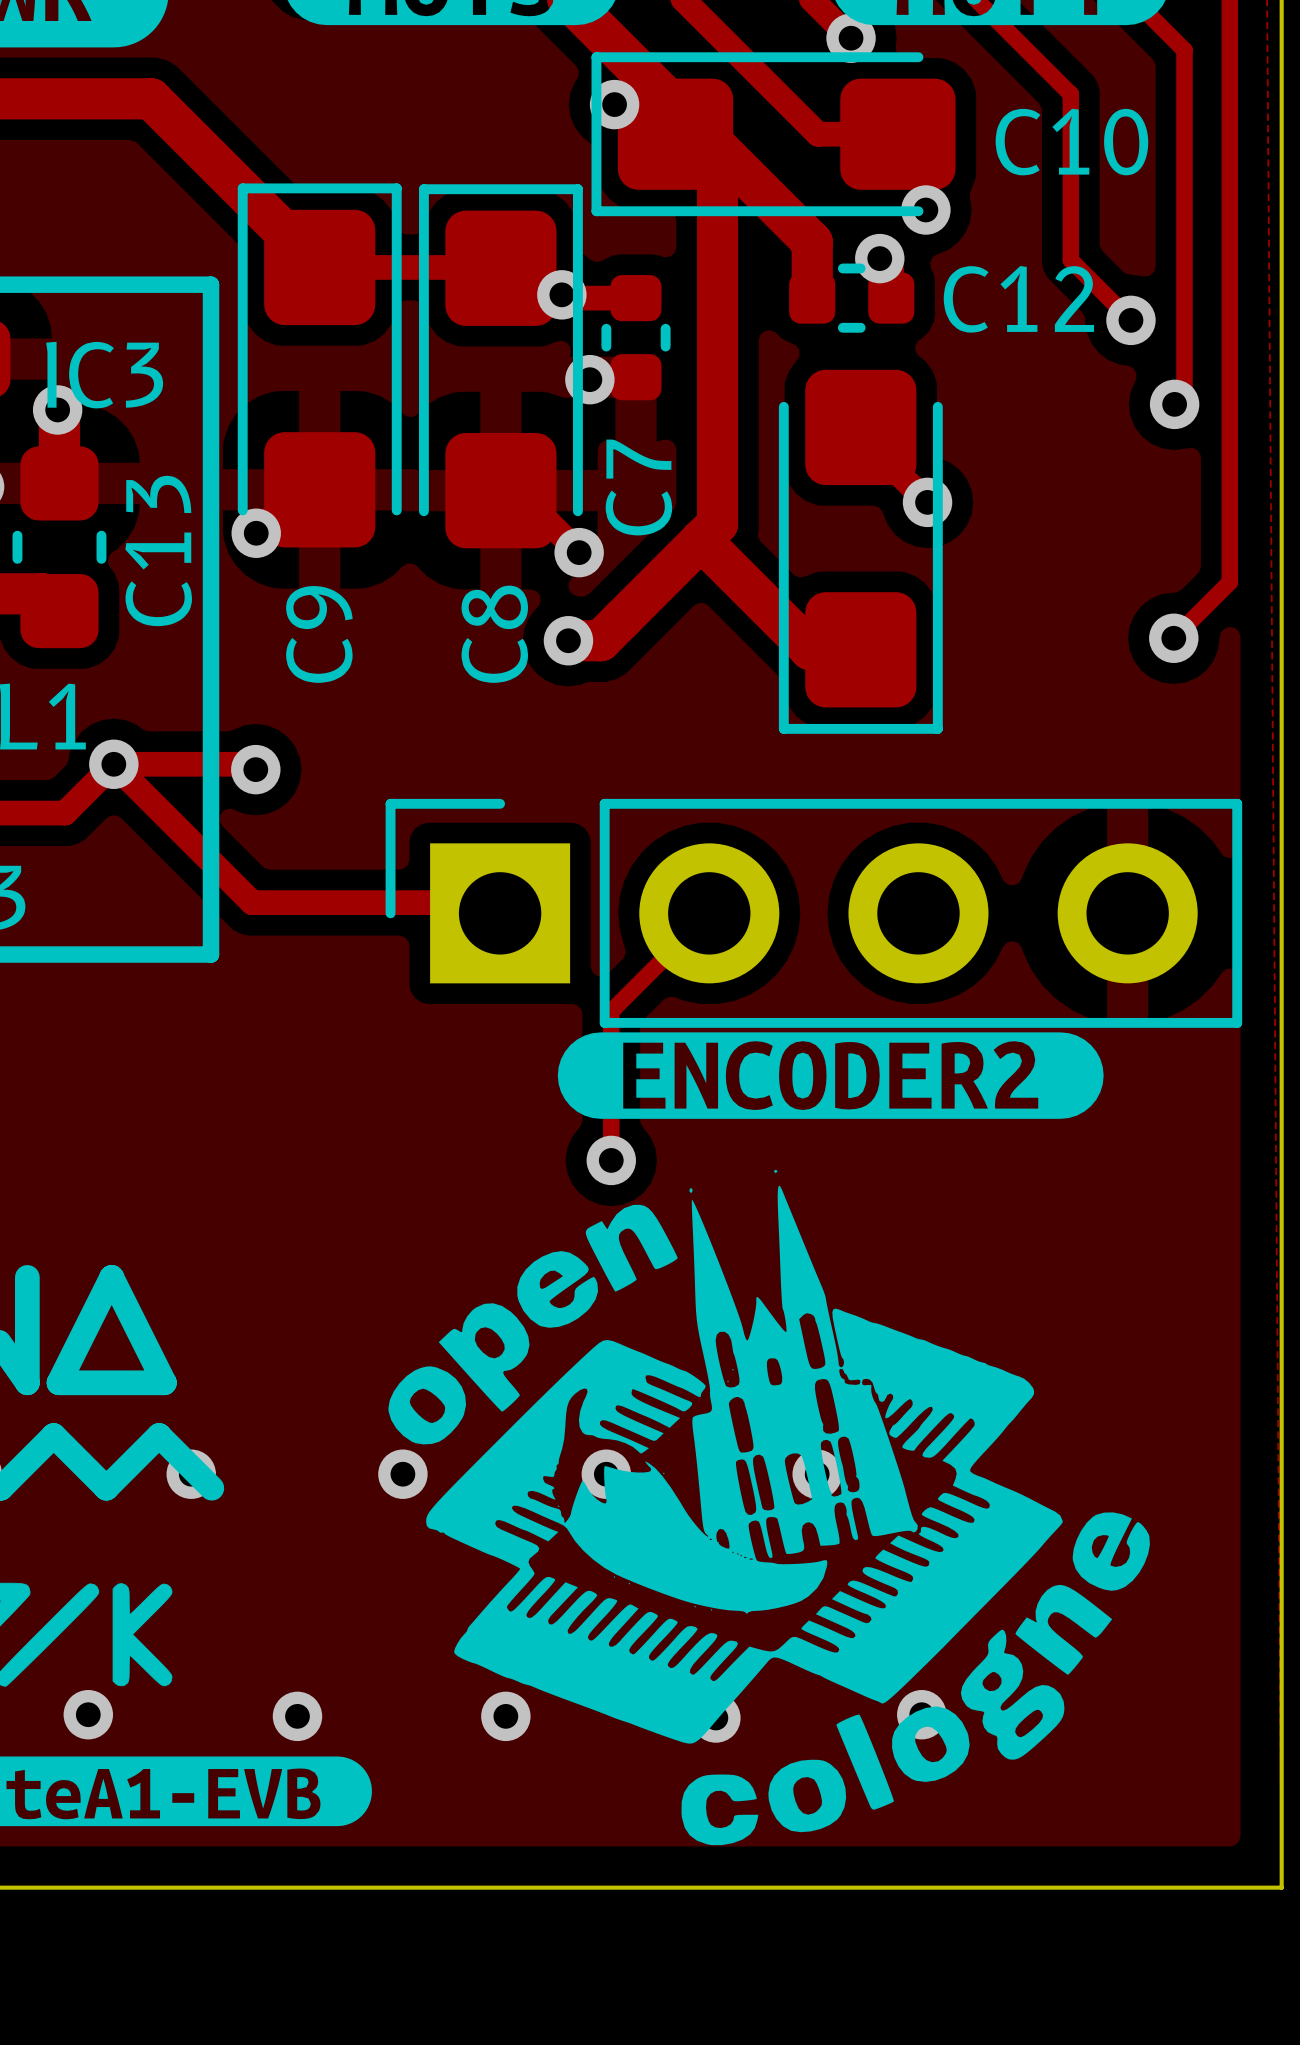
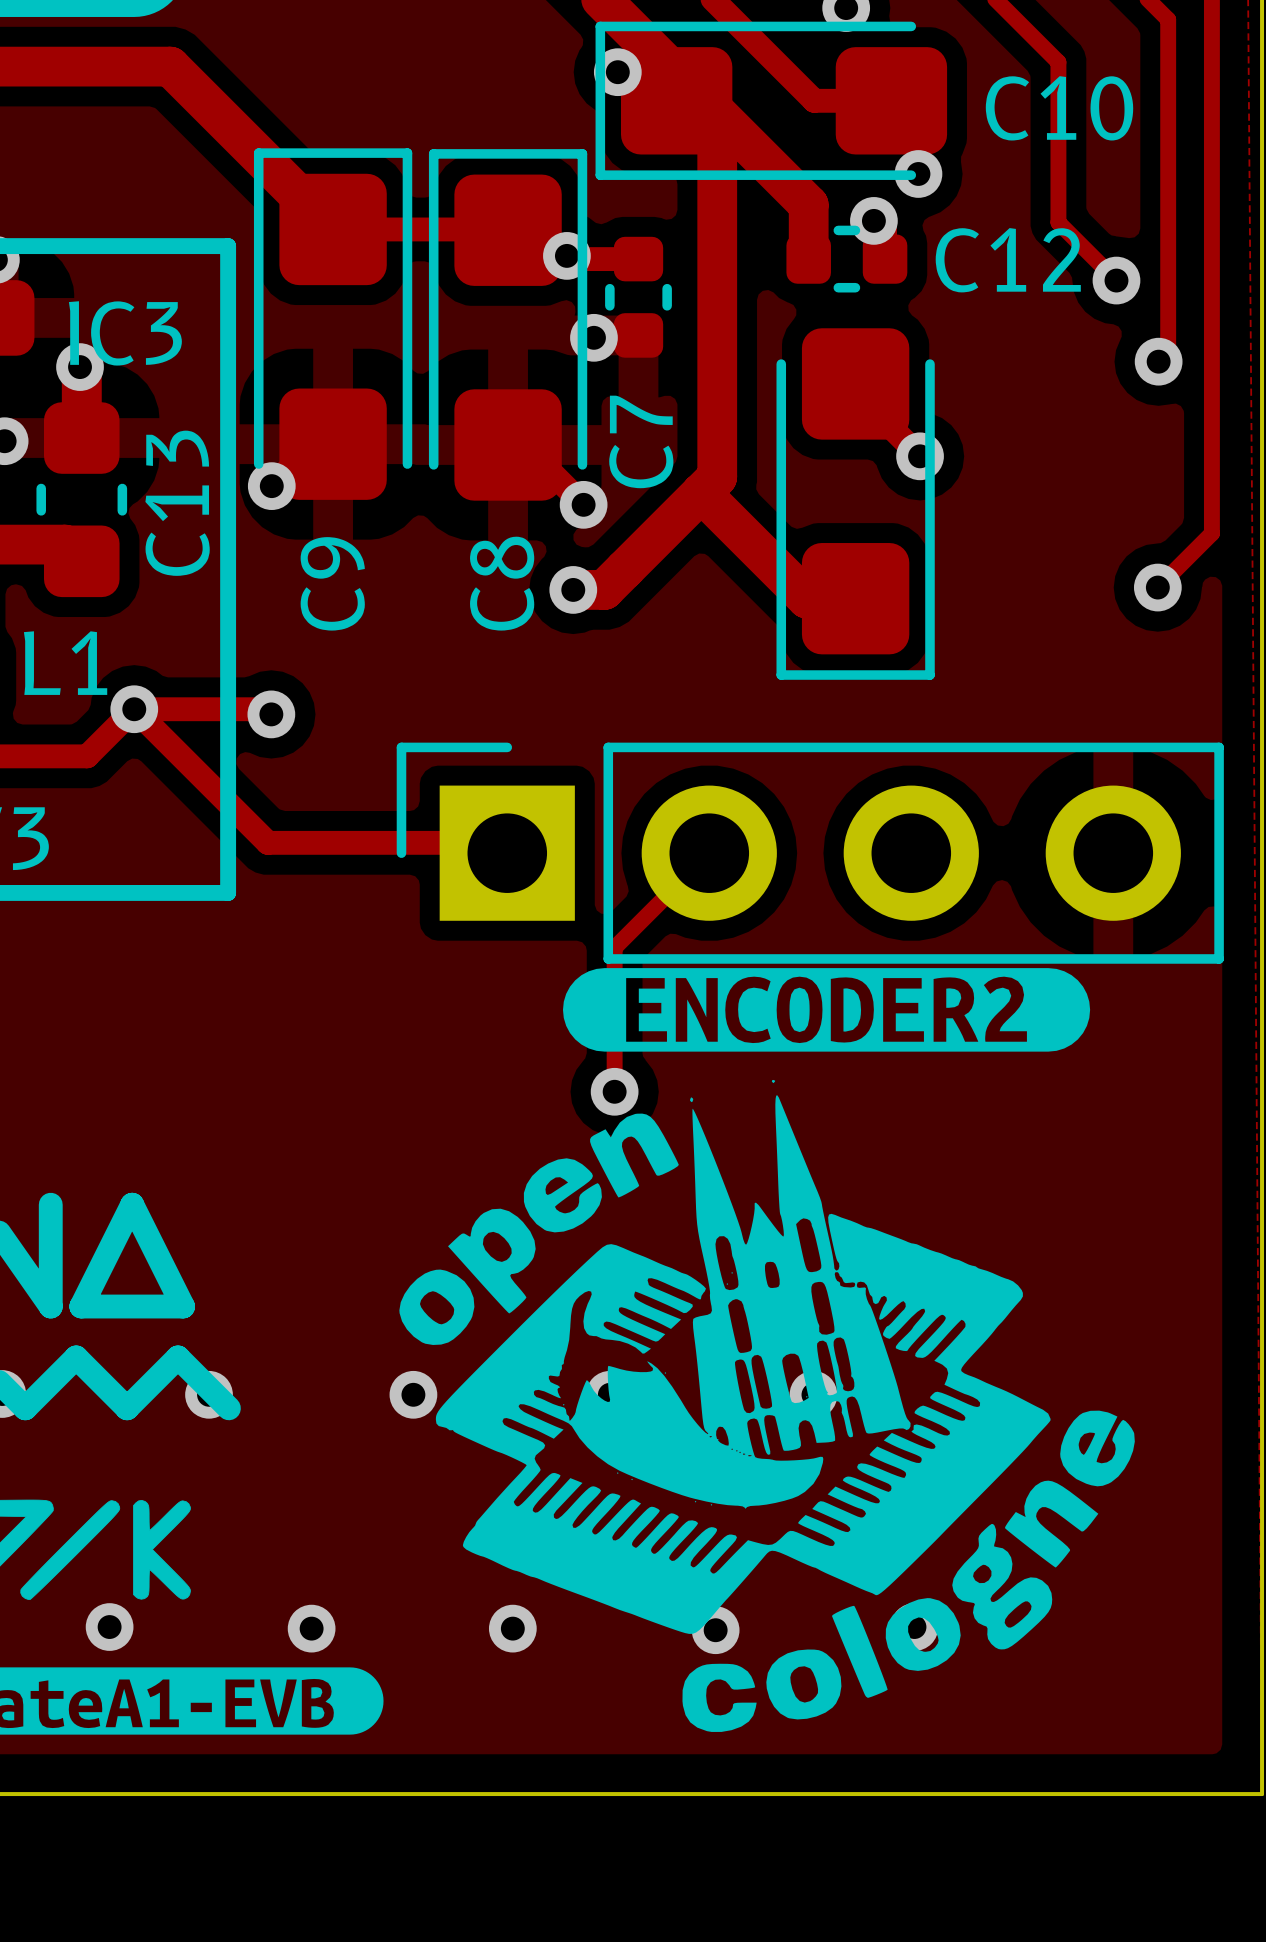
drawing position: (769, 1507) -> (767, 1405)

